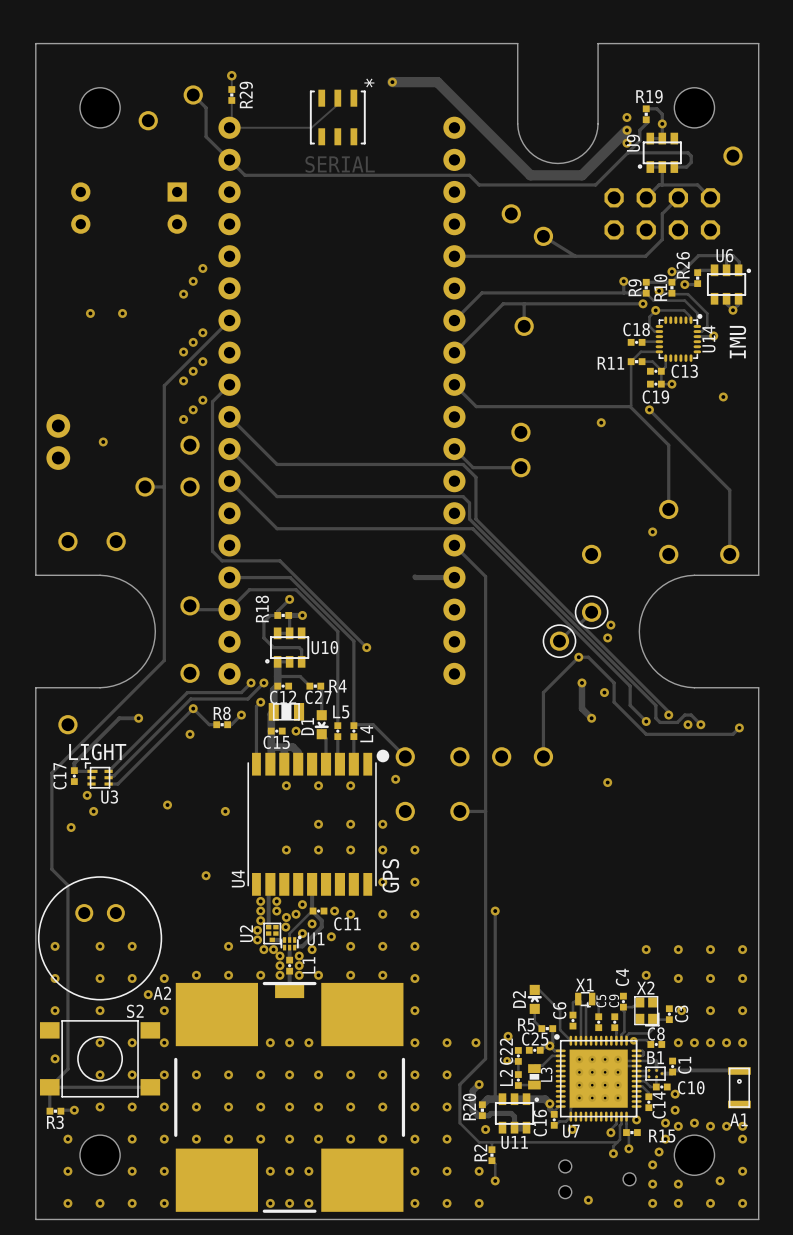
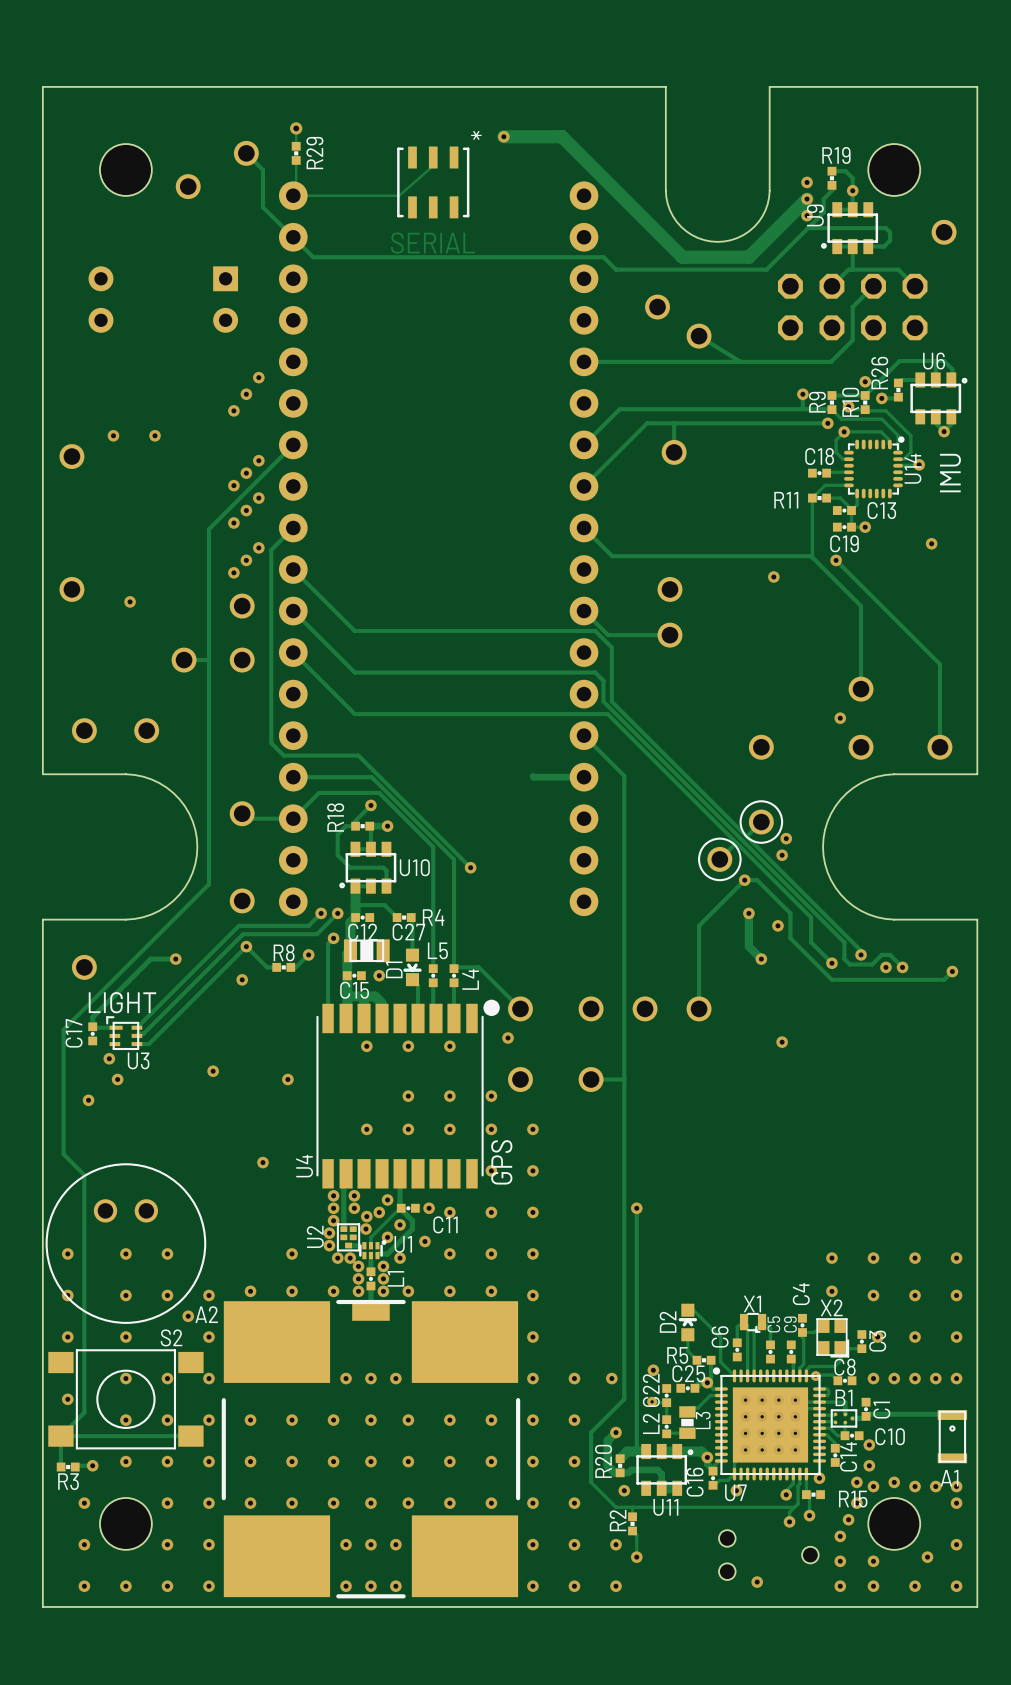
part: none -> (71, 456)
part footprint: [46, 414, 71, 470] -> [59, 576, 85, 602]

